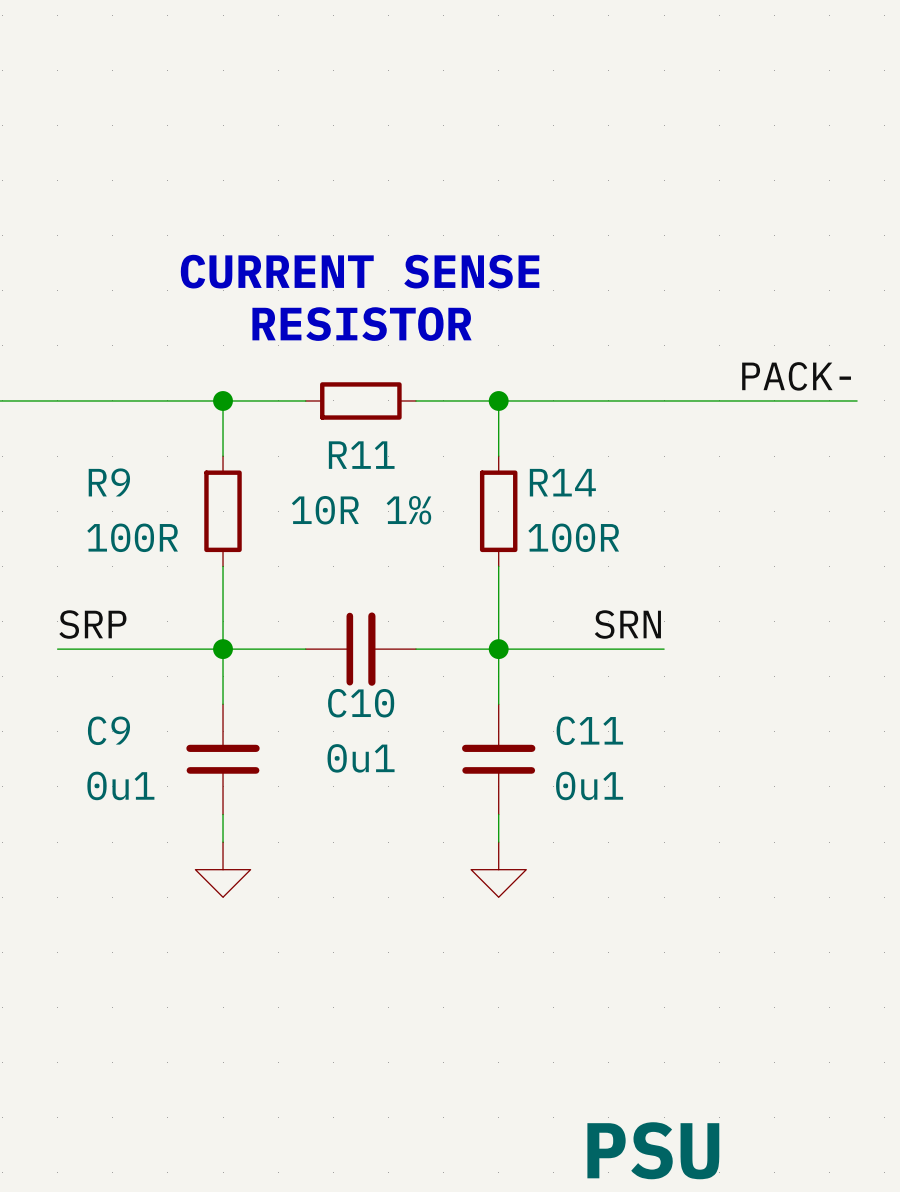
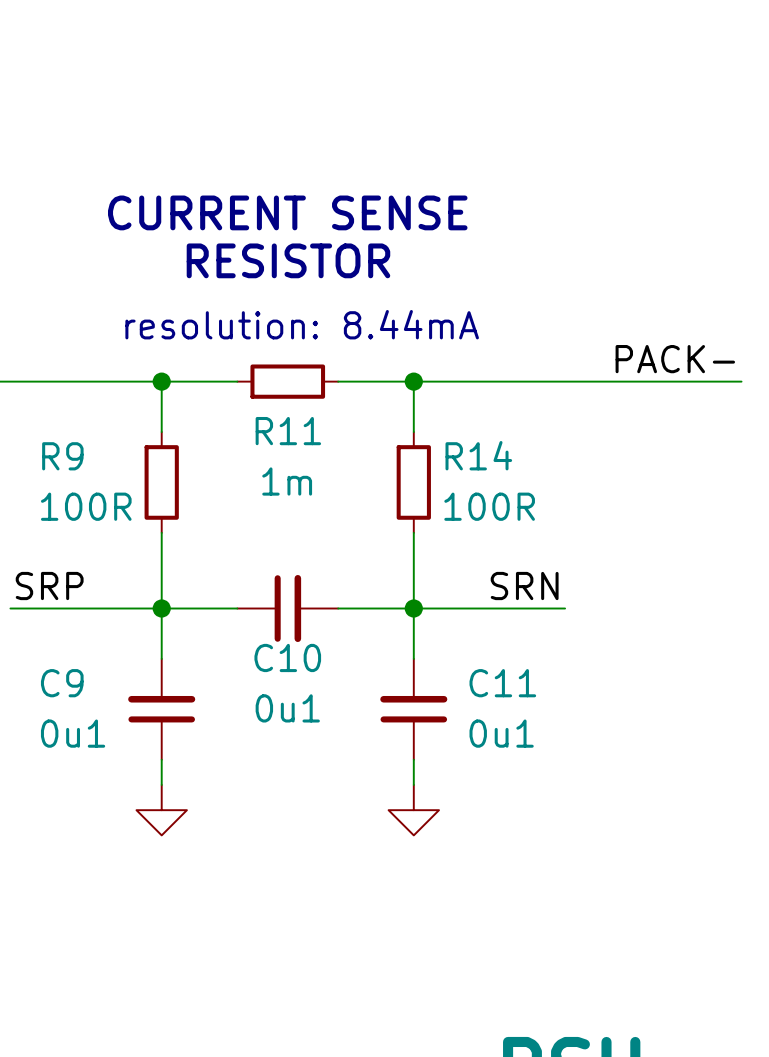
text: none -> CURRENT SENSE (287, 212)
text: CURRENT SENSE (360, 271) -> RESISTOR (288, 260)
text: RESISTOR (362, 324) -> resolution: 8.44mA (302, 324)
R11 value: 10R 1% (361, 510) -> 1m (287, 481)

